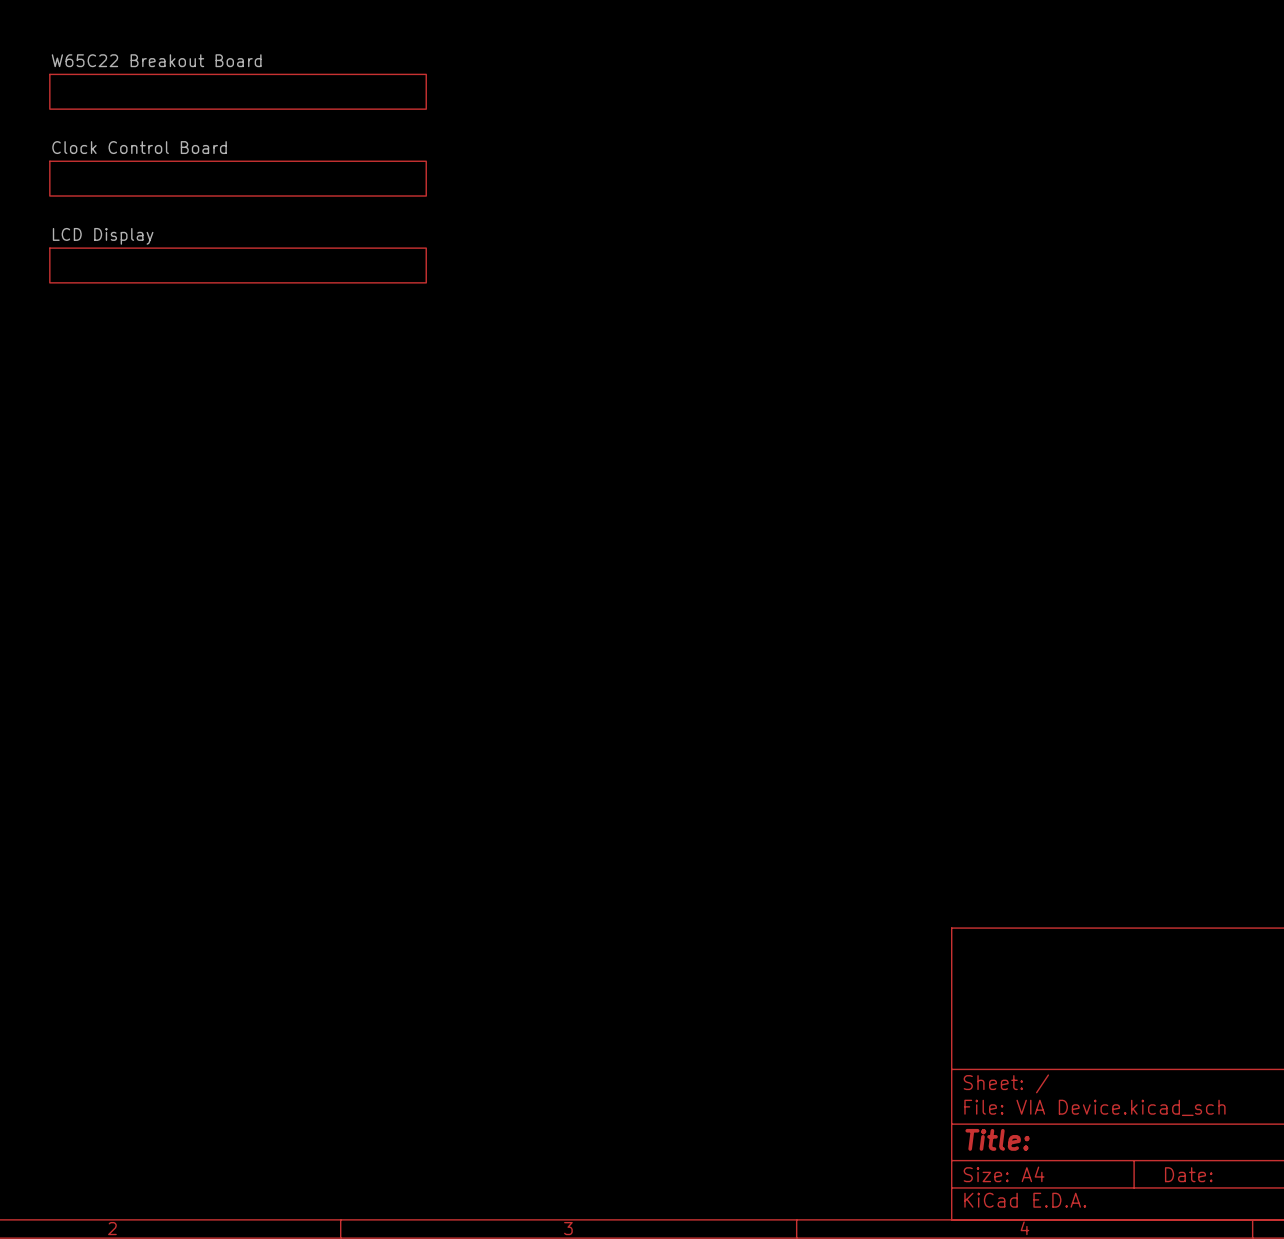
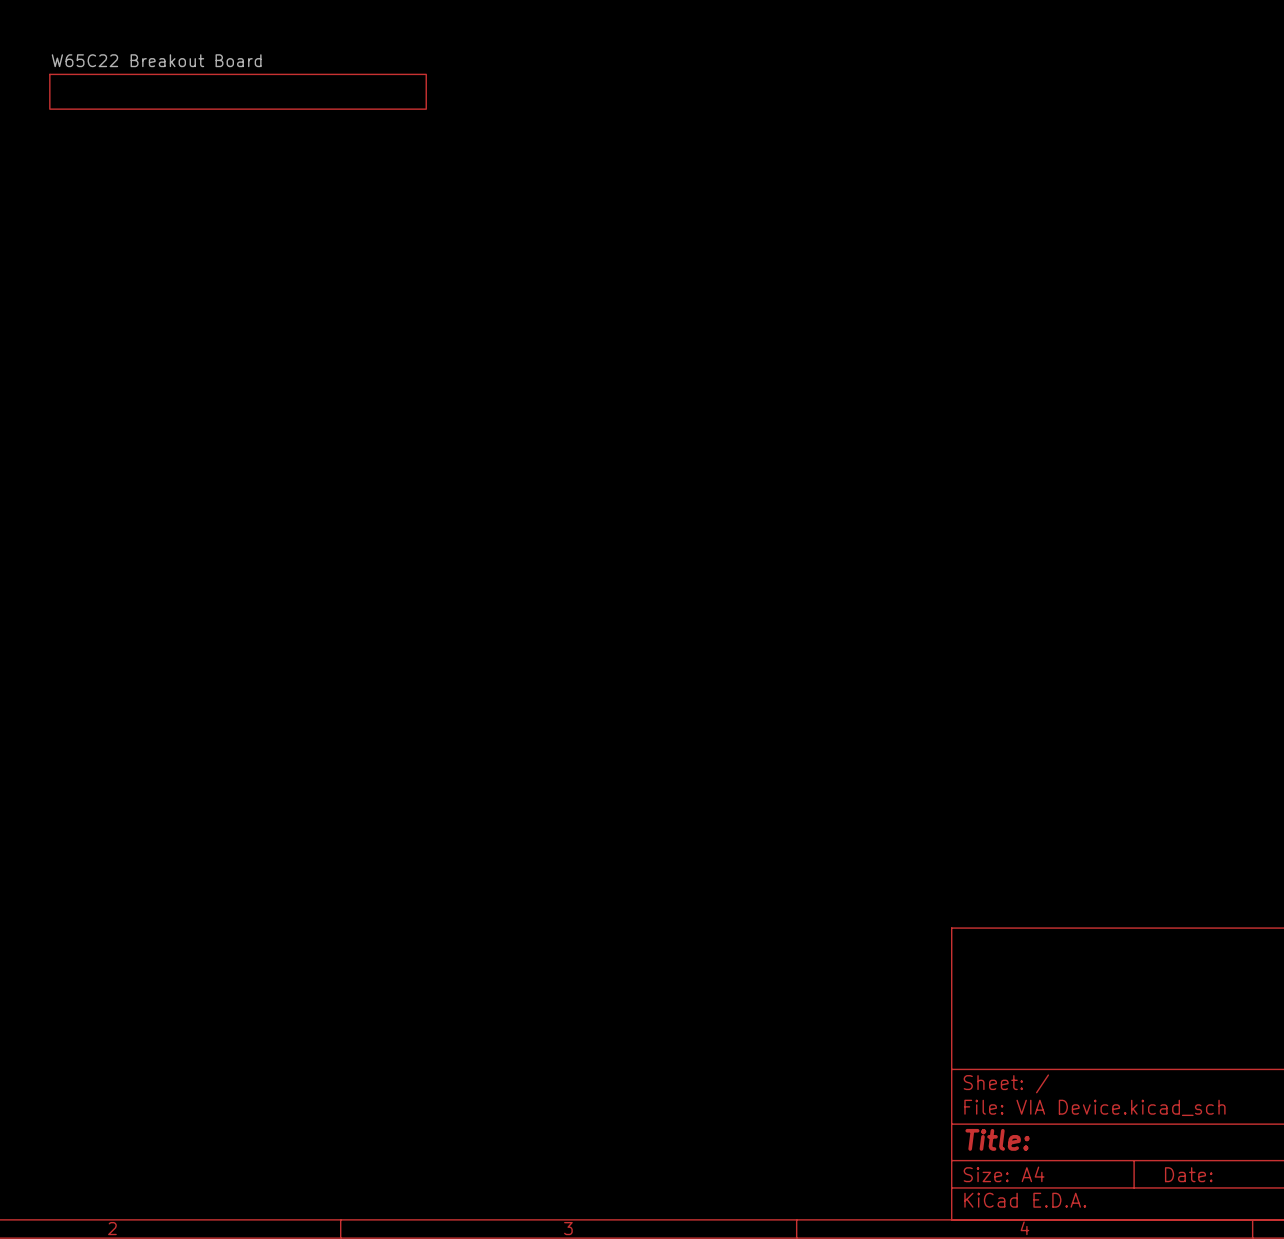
sheet Clock Control Board: (238, 178) -> none
sheet LCD Display: (238, 265) -> none

